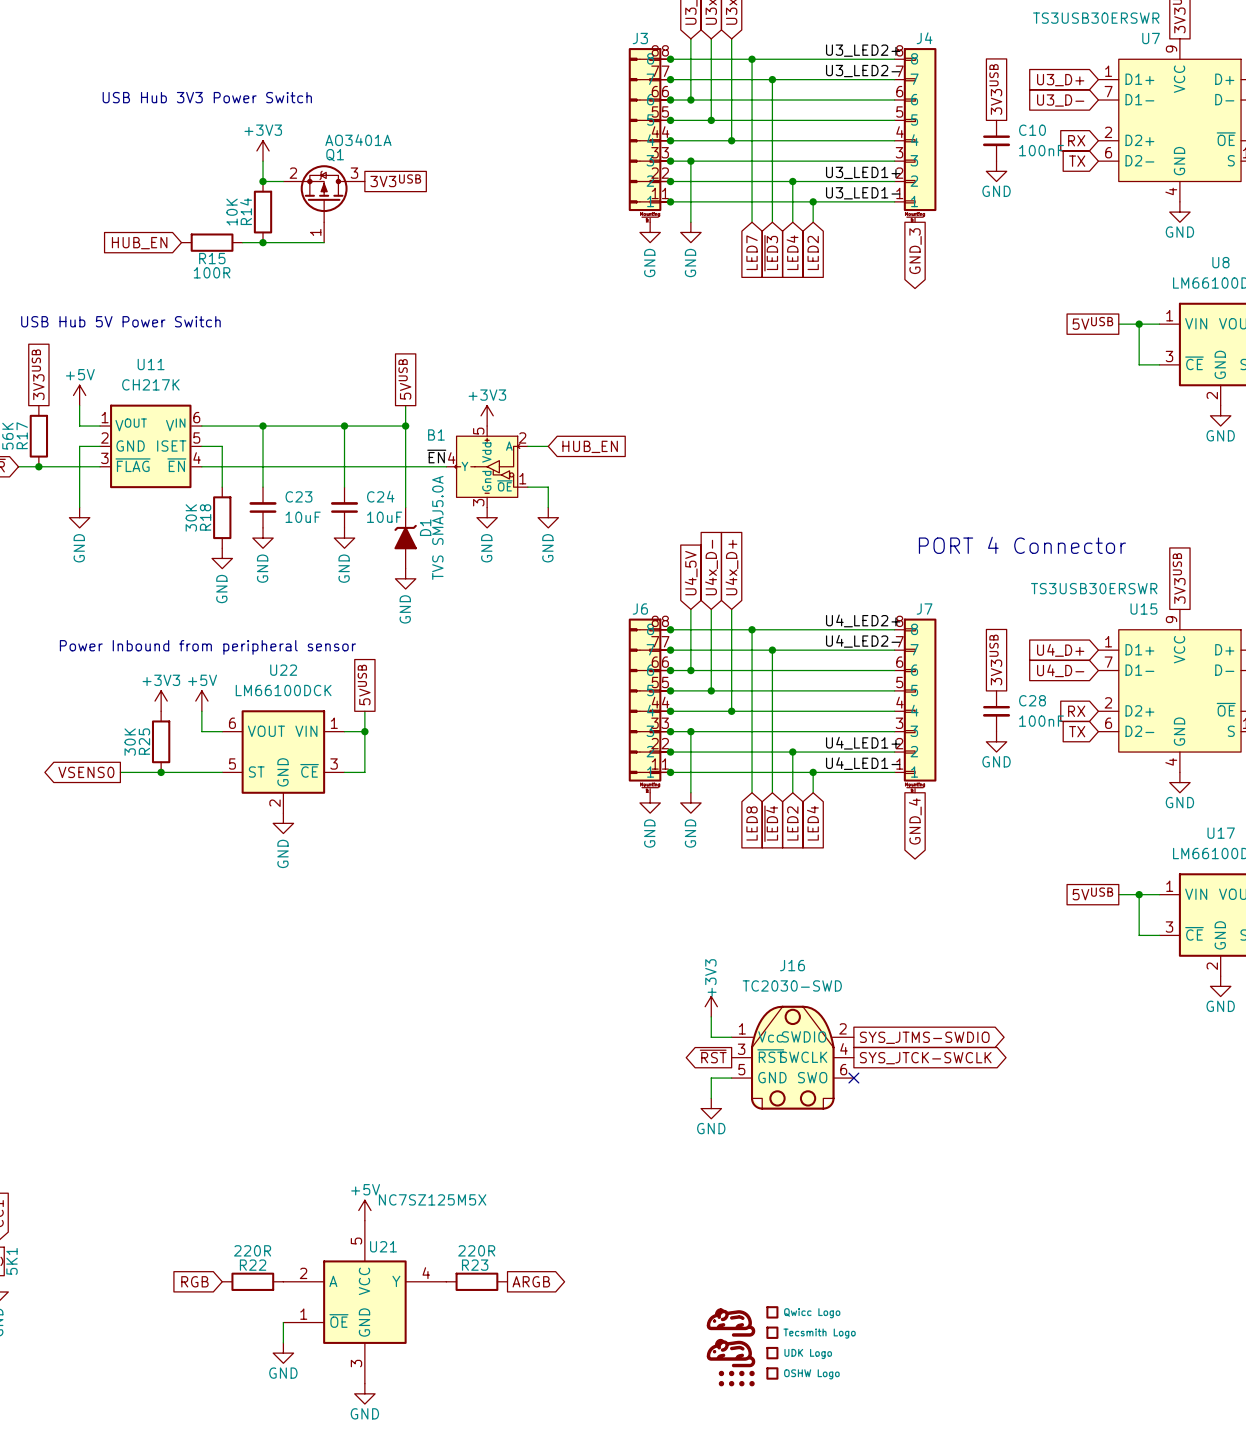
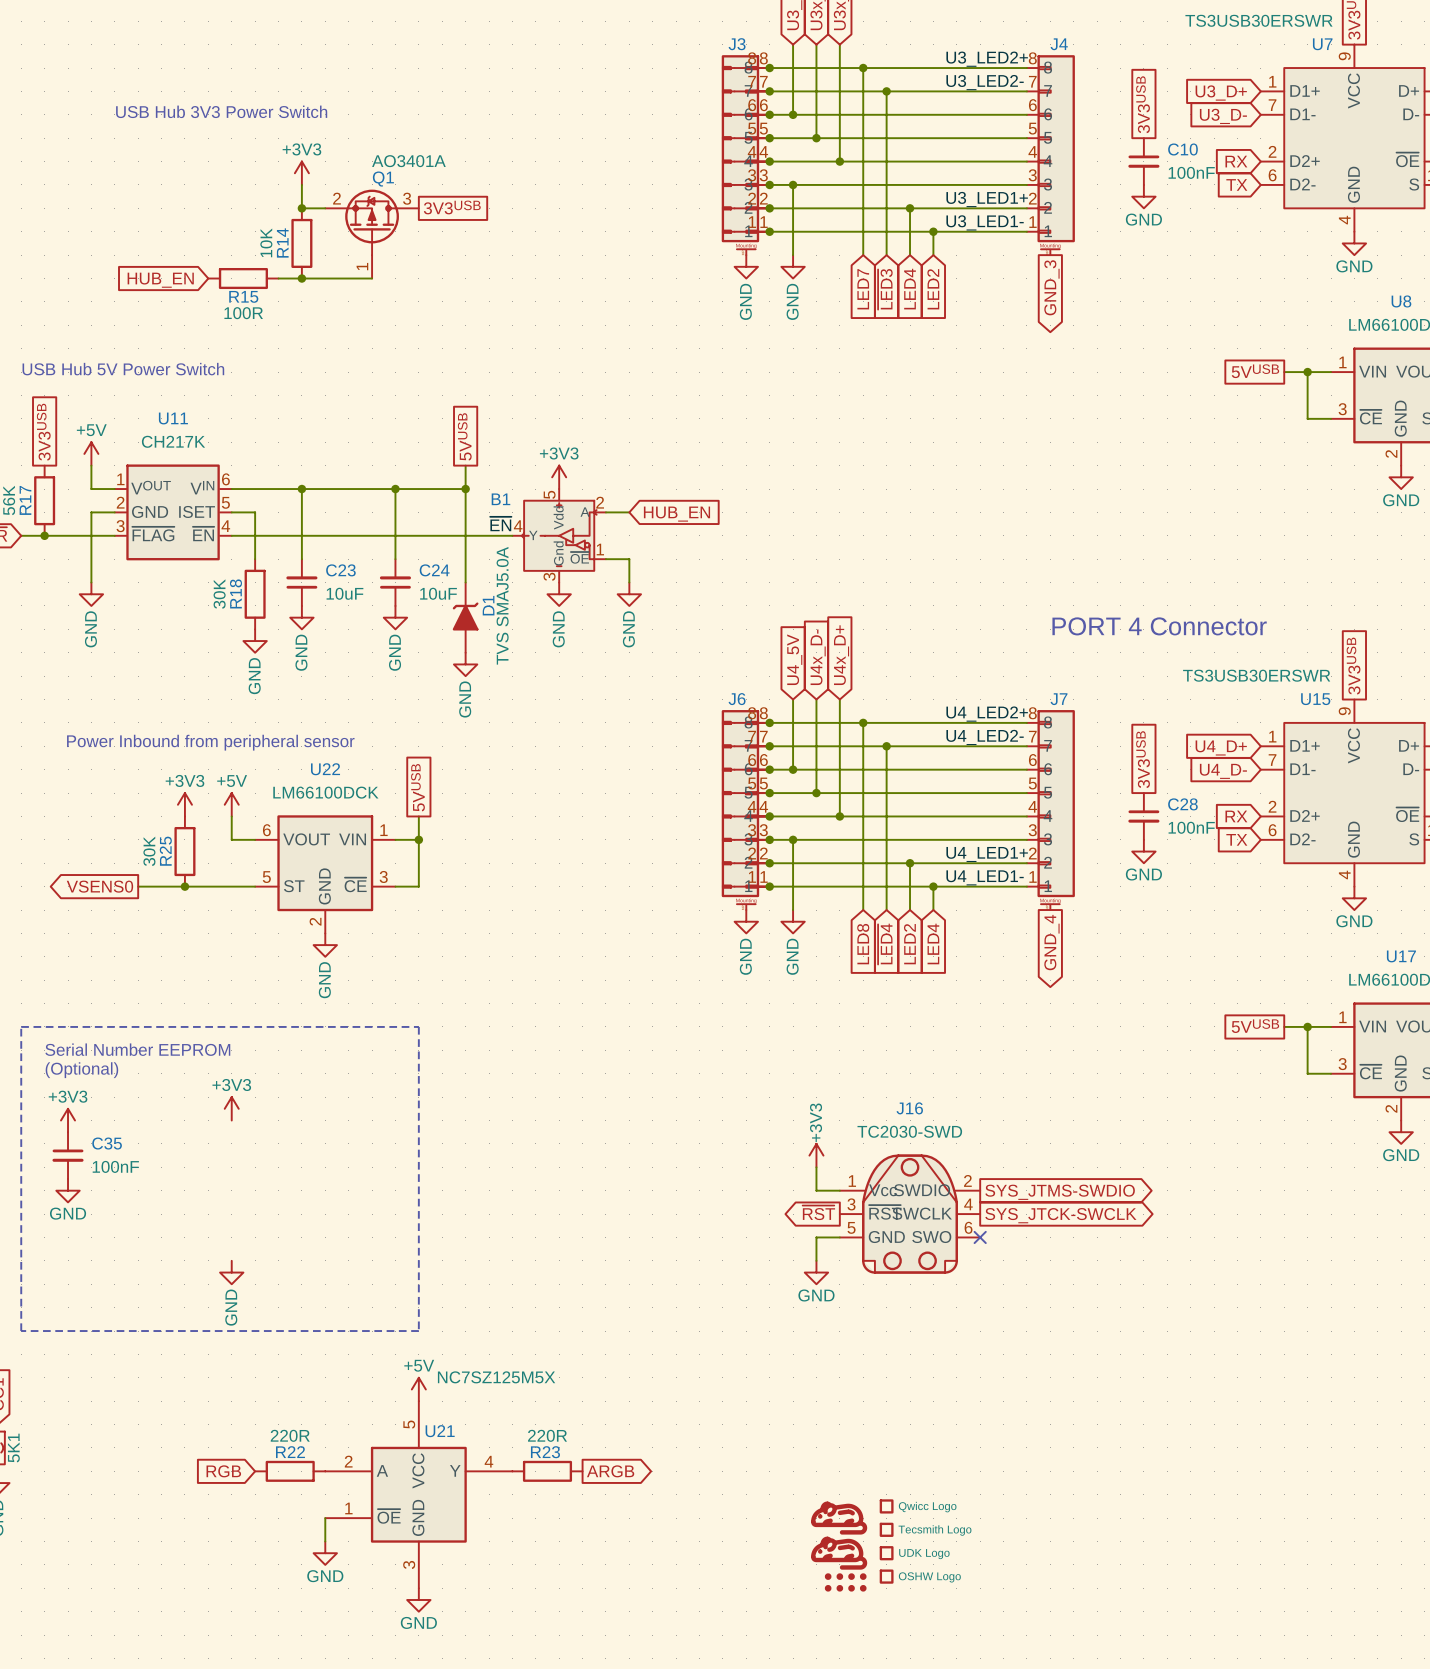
line: none -> (21, 1026) (418, 1026) (418, 1331) (21, 1331) (21, 1026)
text: none -> Serial Number EEPROM (137, 1049)
text: none -> (Optional) (81, 1070)
power symbol: none -> +3V3 (231, 1108)
power symbol: none -> +3V3 (68, 1120)
C35: none -> 100nF (68, 1155)
power symbol: none -> GND (68, 1190)
power symbol: none -> GND (231, 1272)

